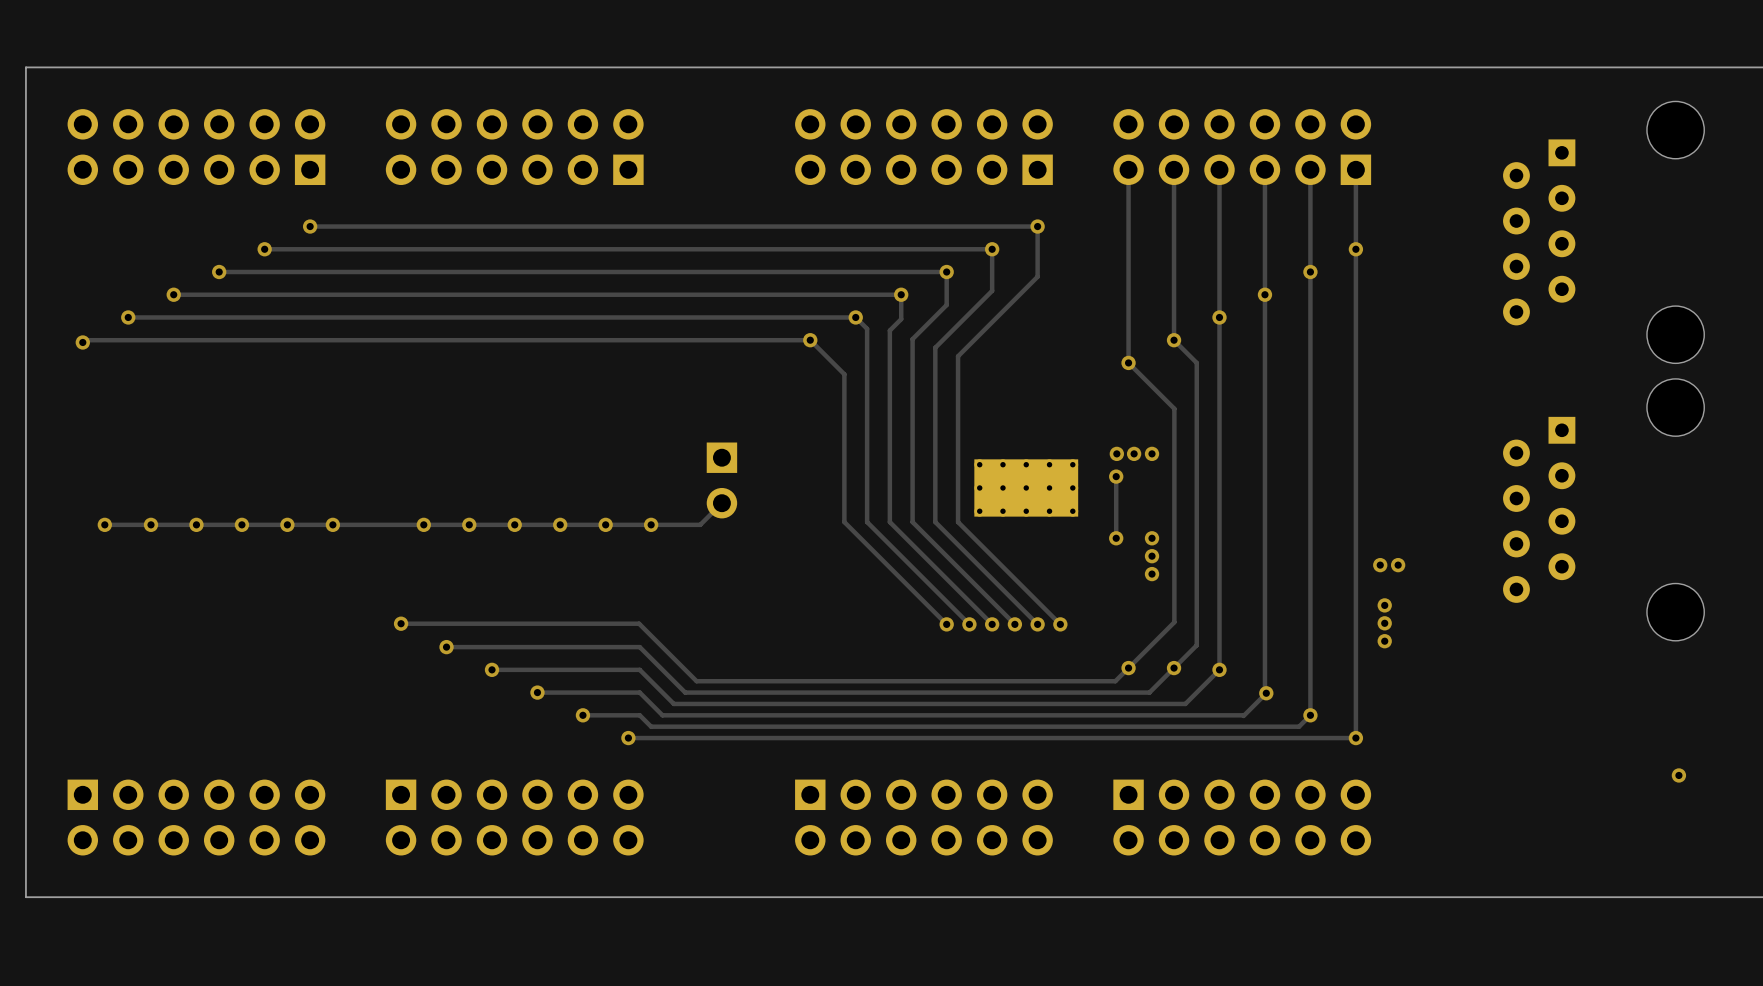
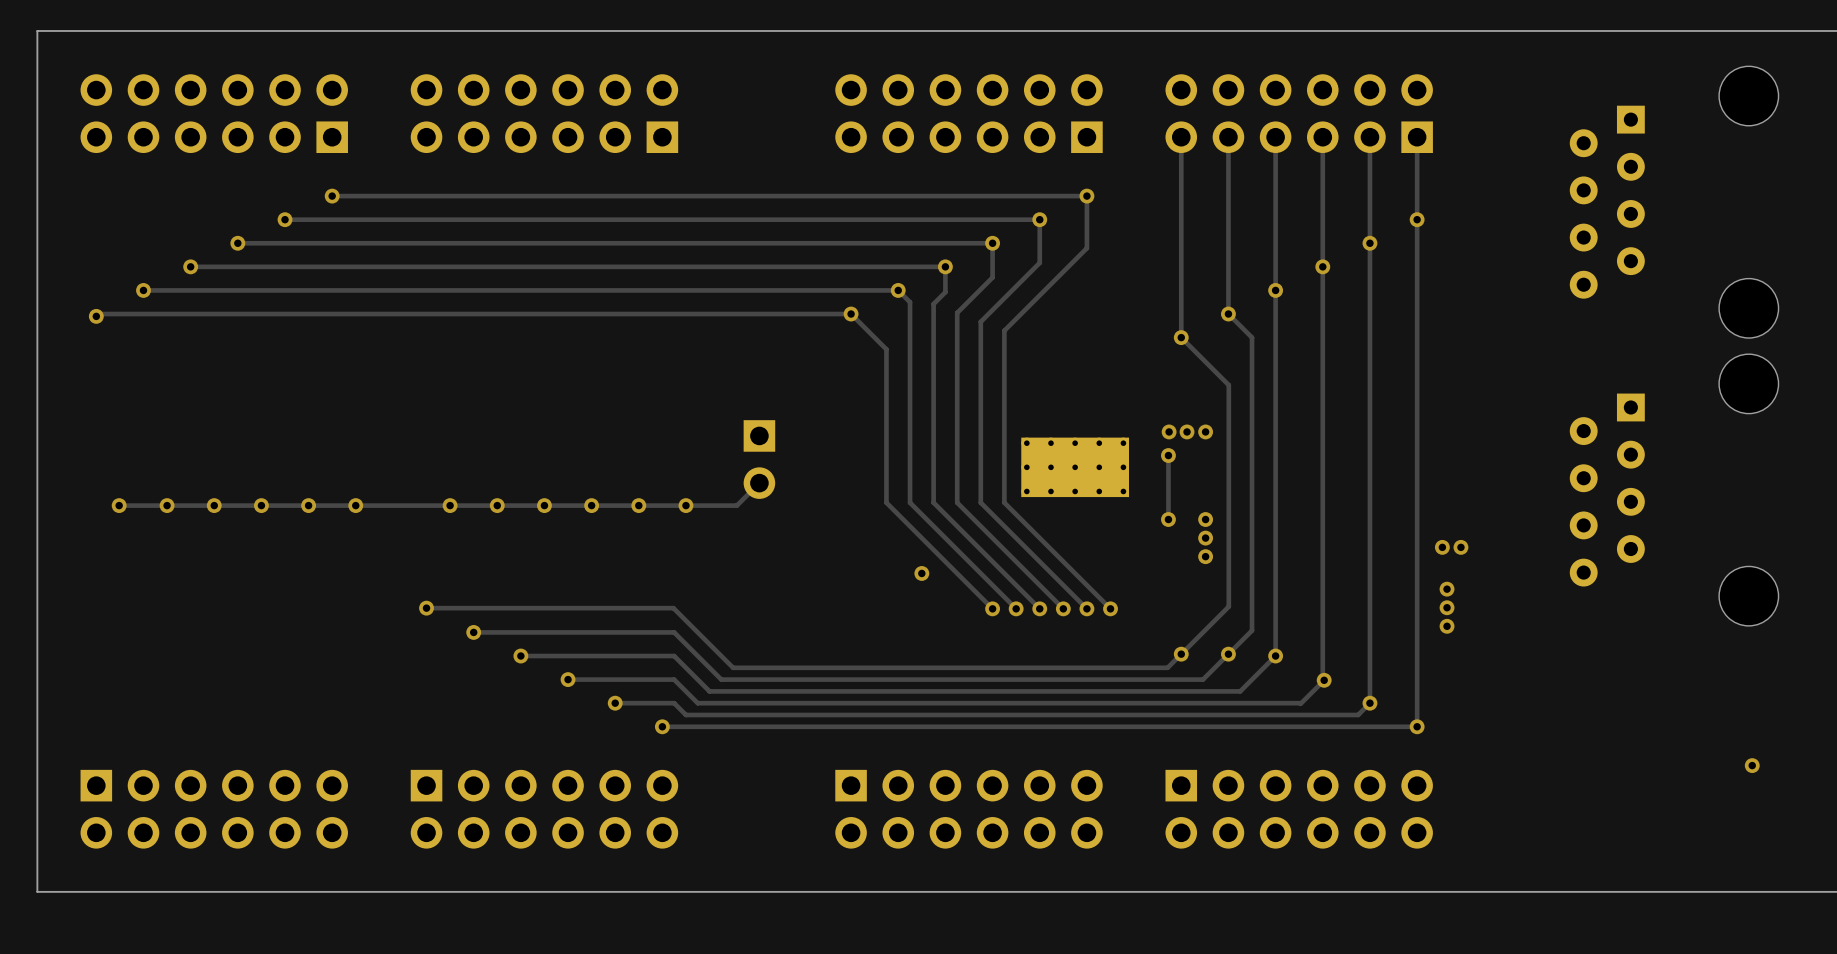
via: none -> (921, 573)

